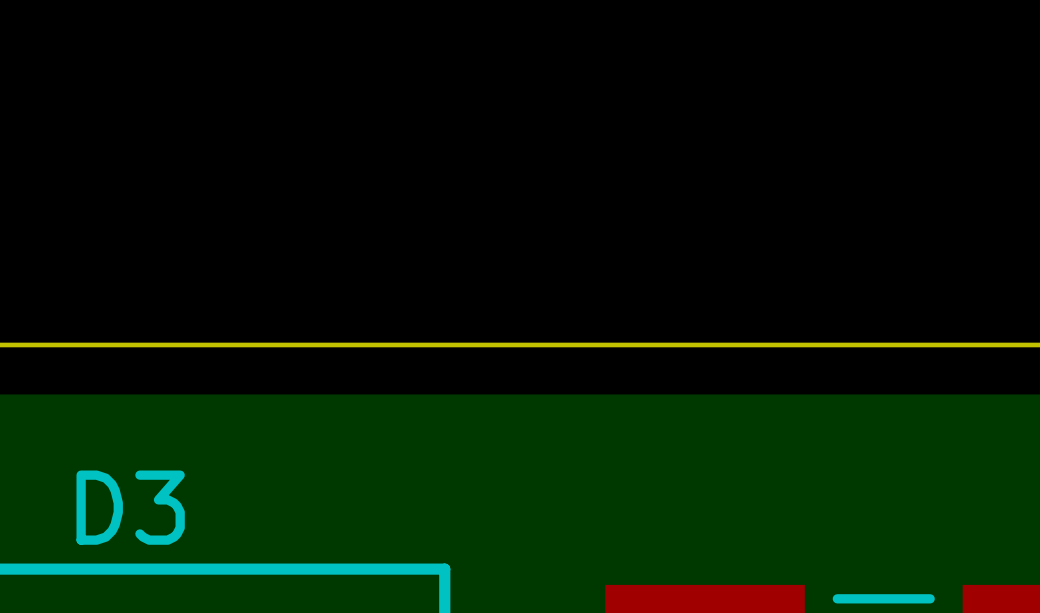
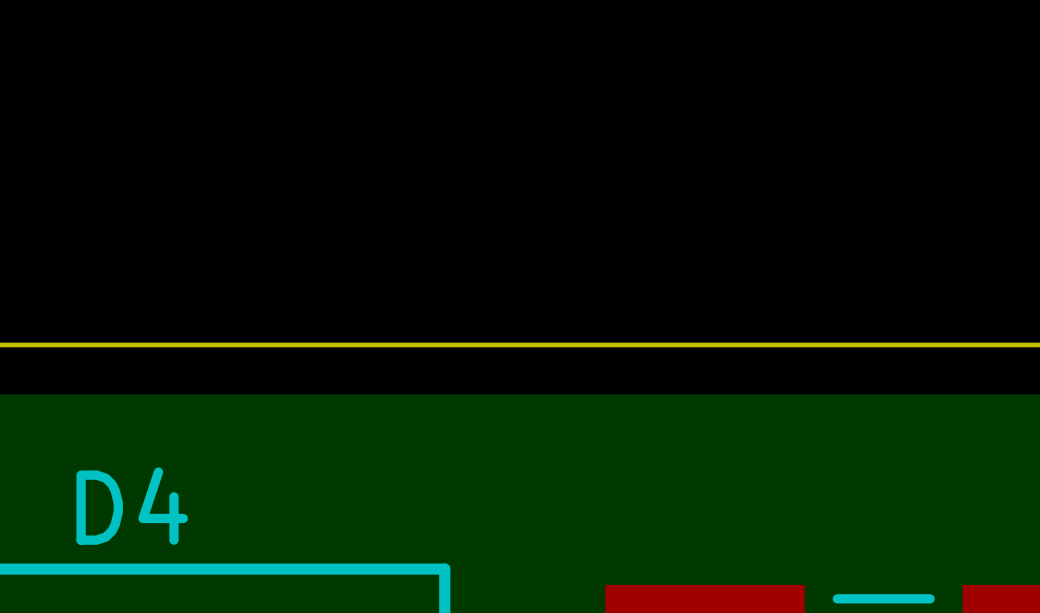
D3 name: D3 (130, 507) -> D4 (132, 506)

